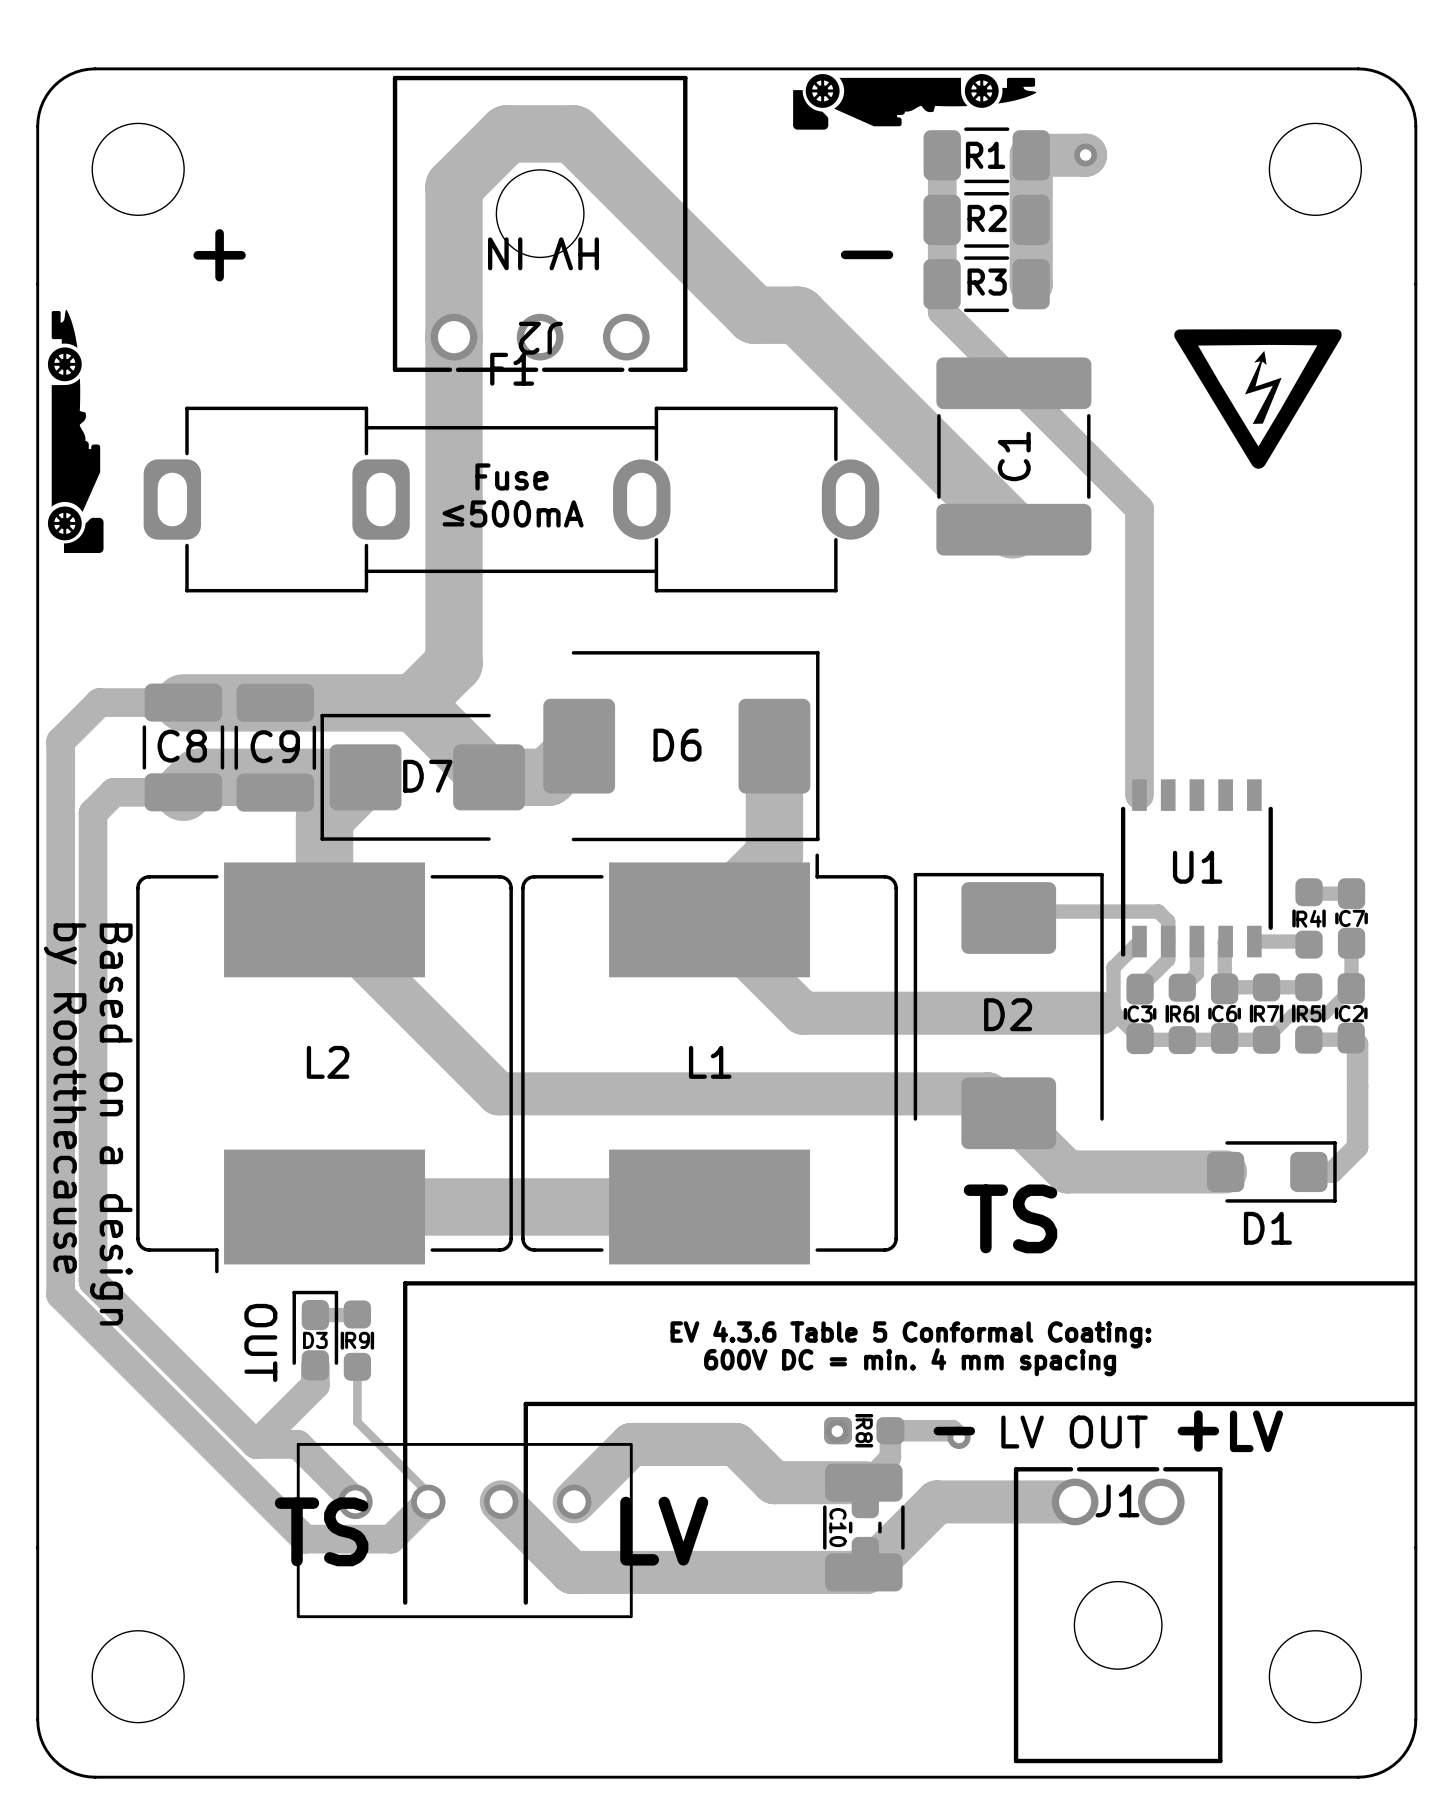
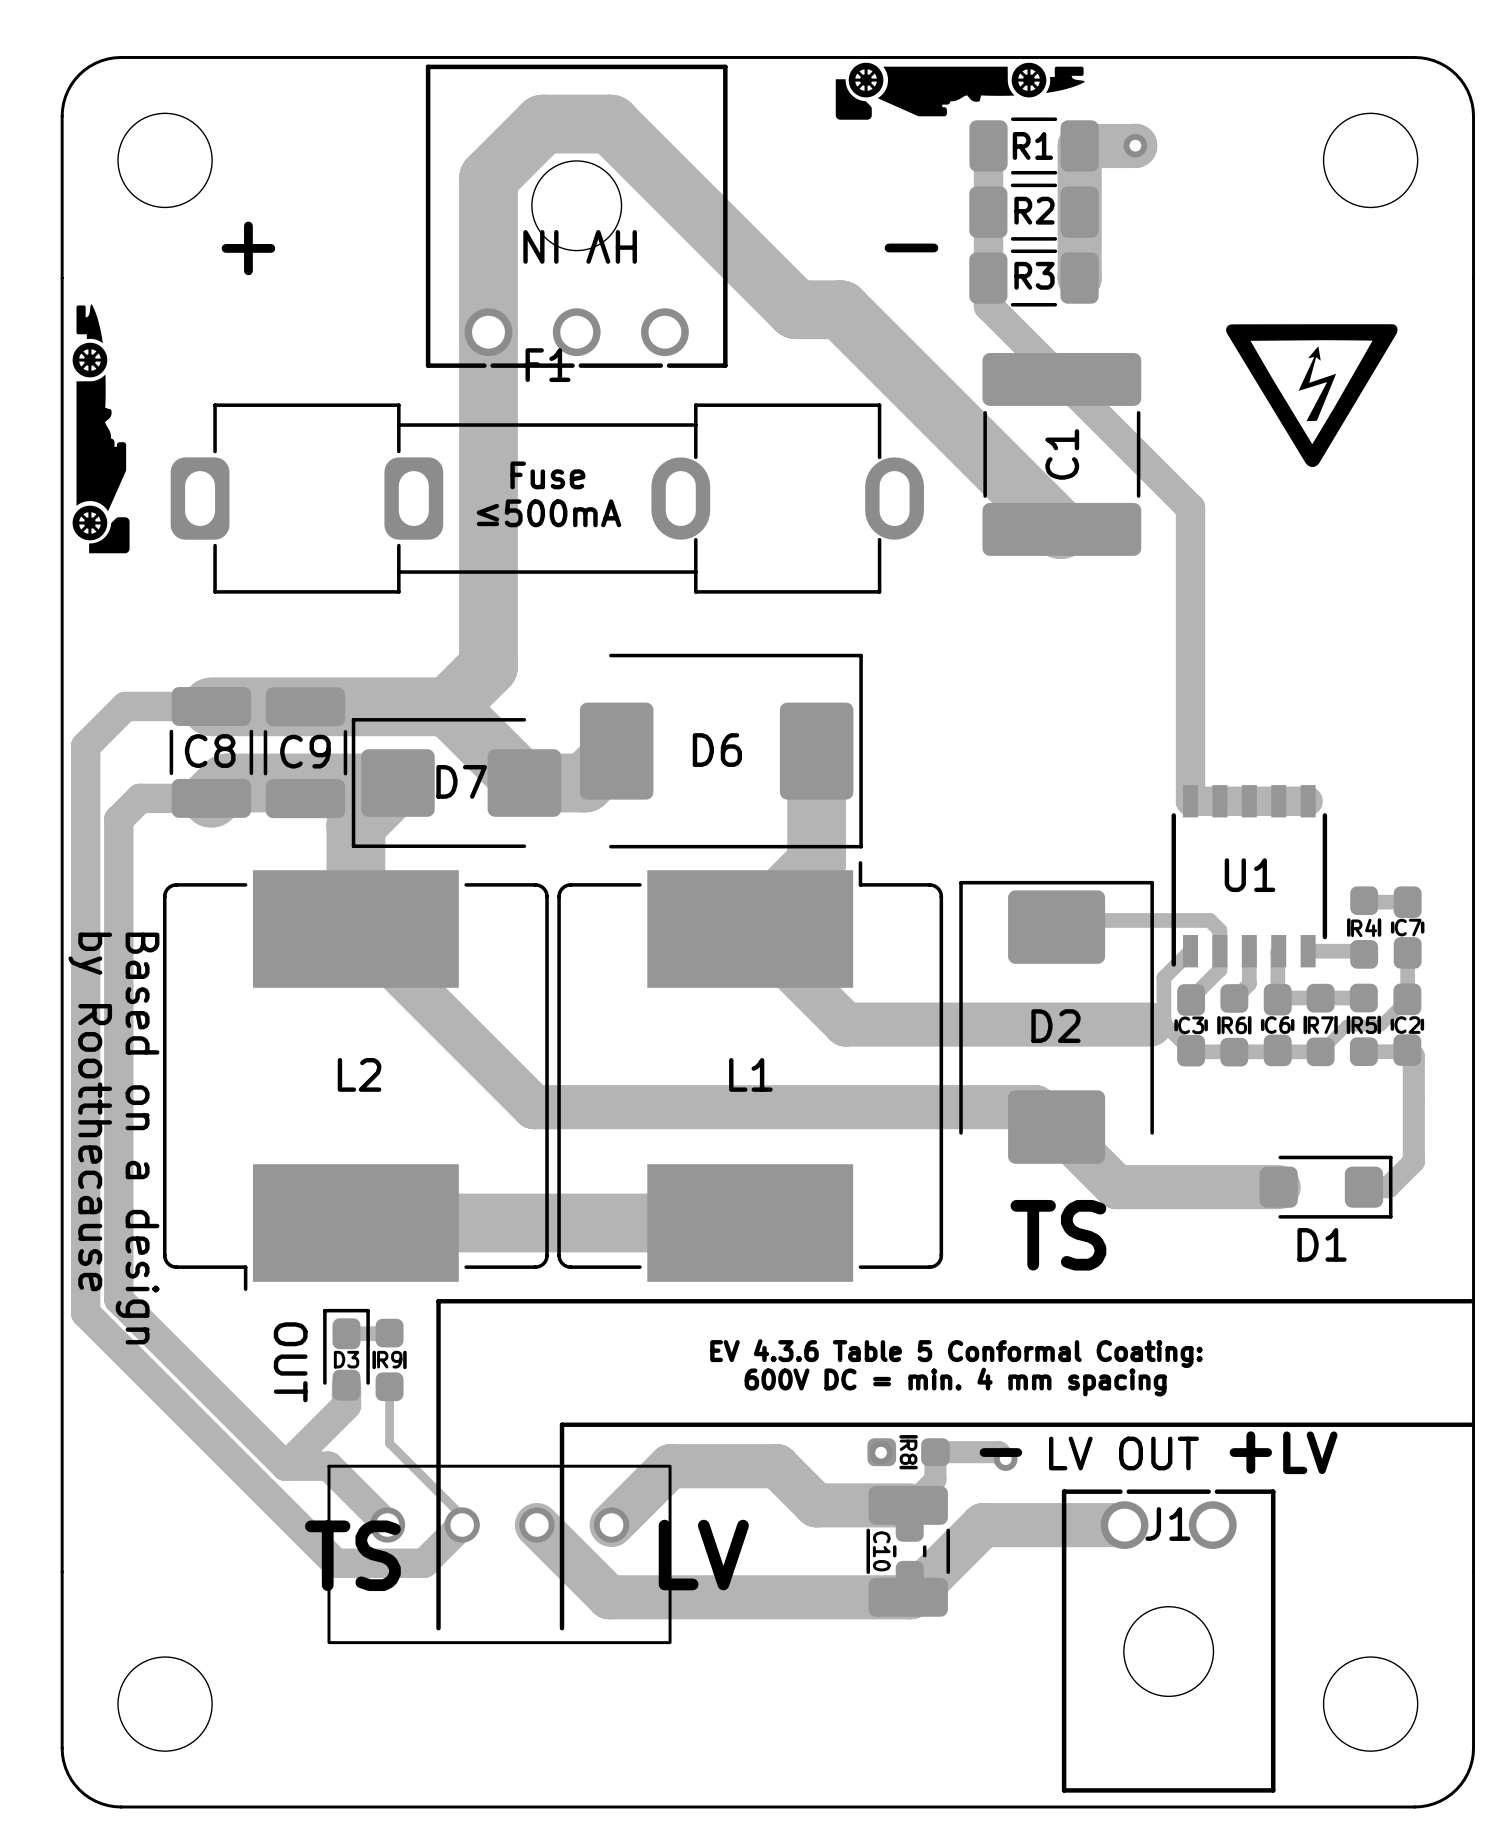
J2 name: J2 (540, 338) -> none
track: none -> (1190, 801) (1308, 801)

